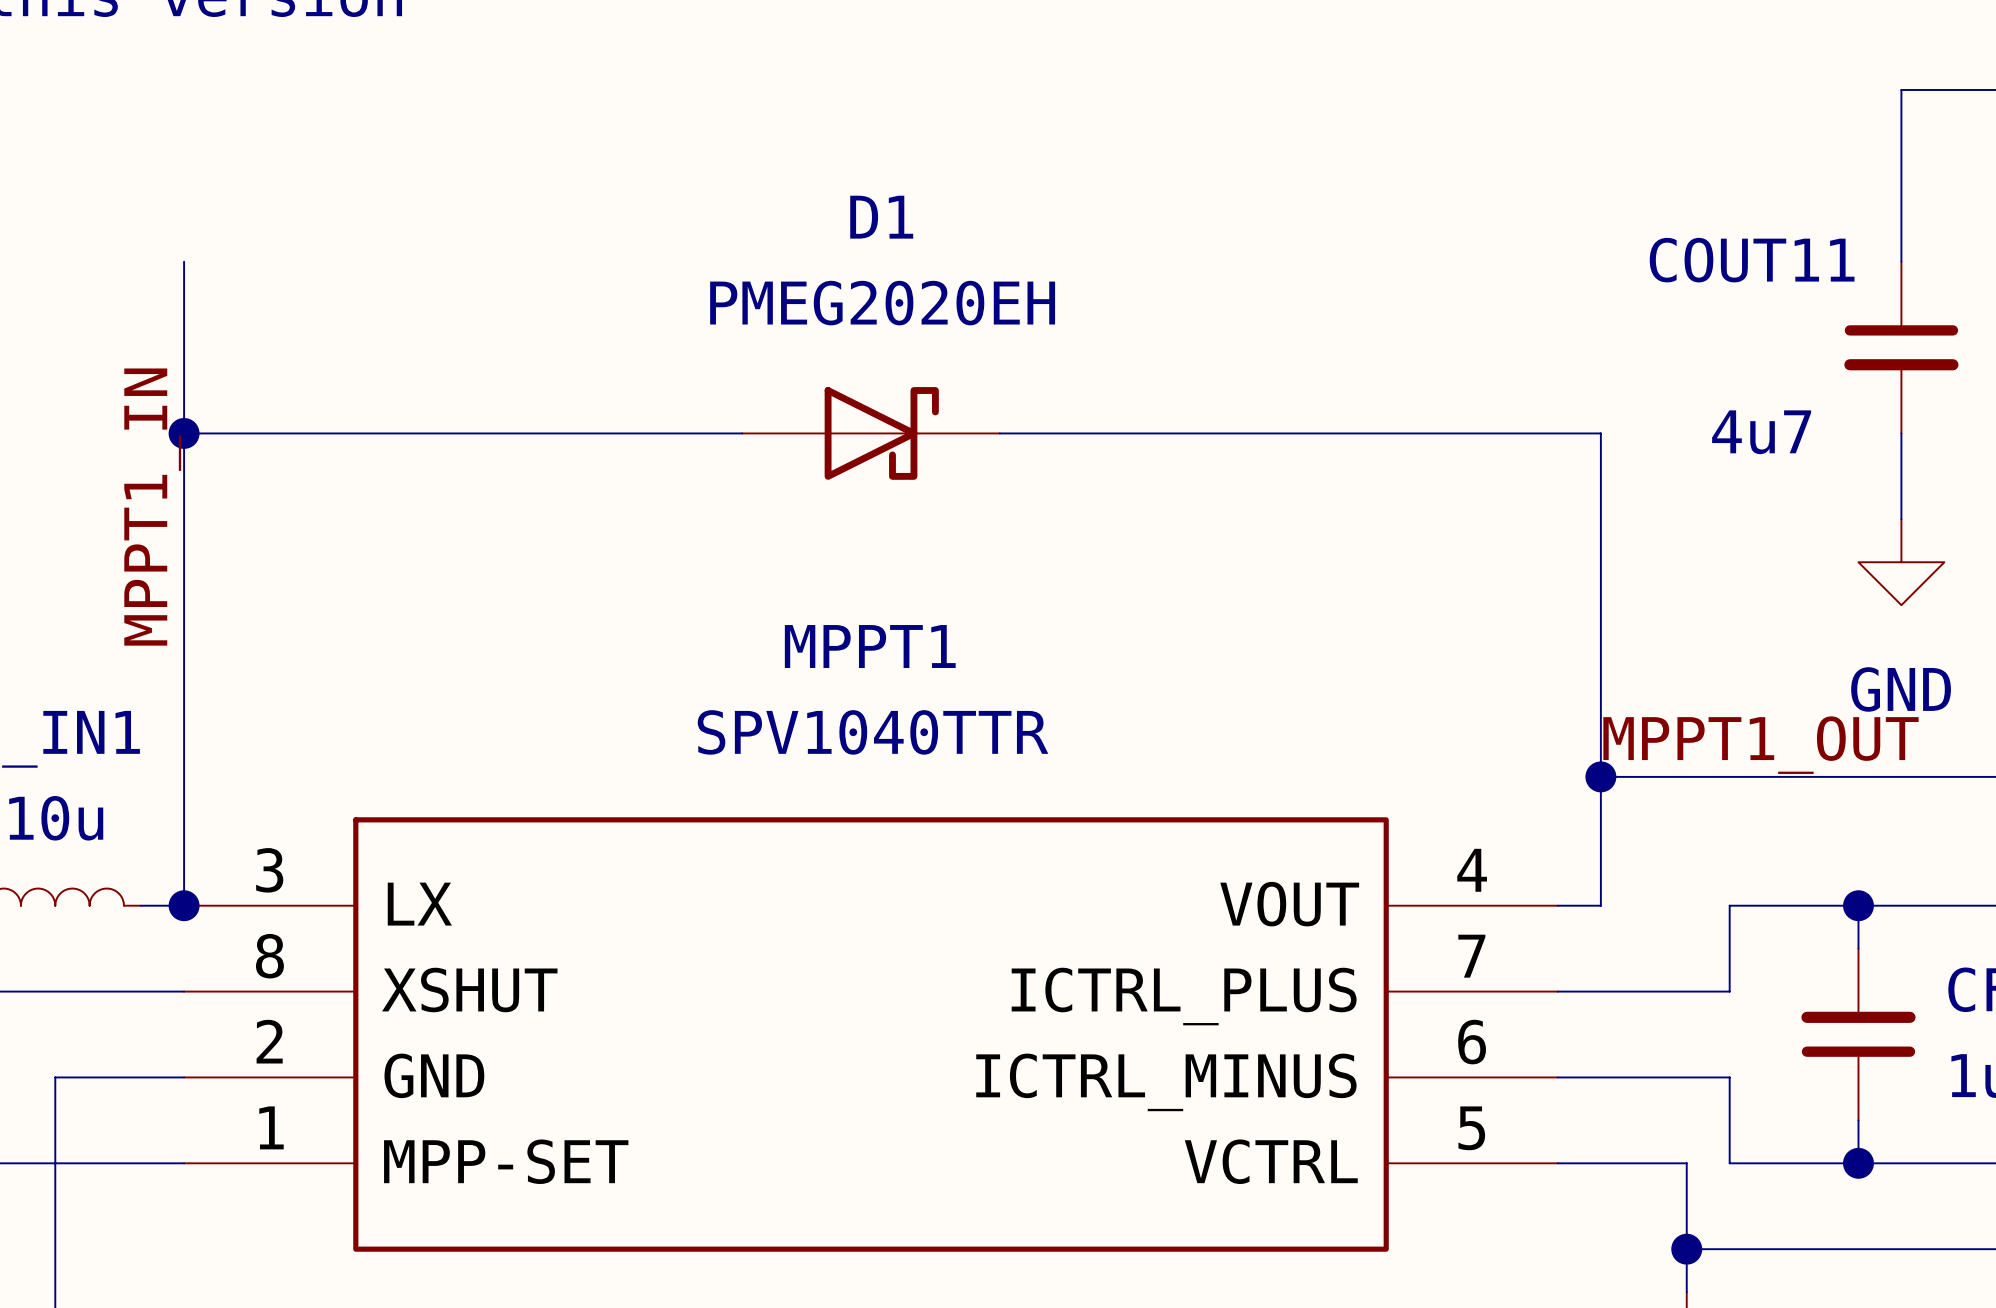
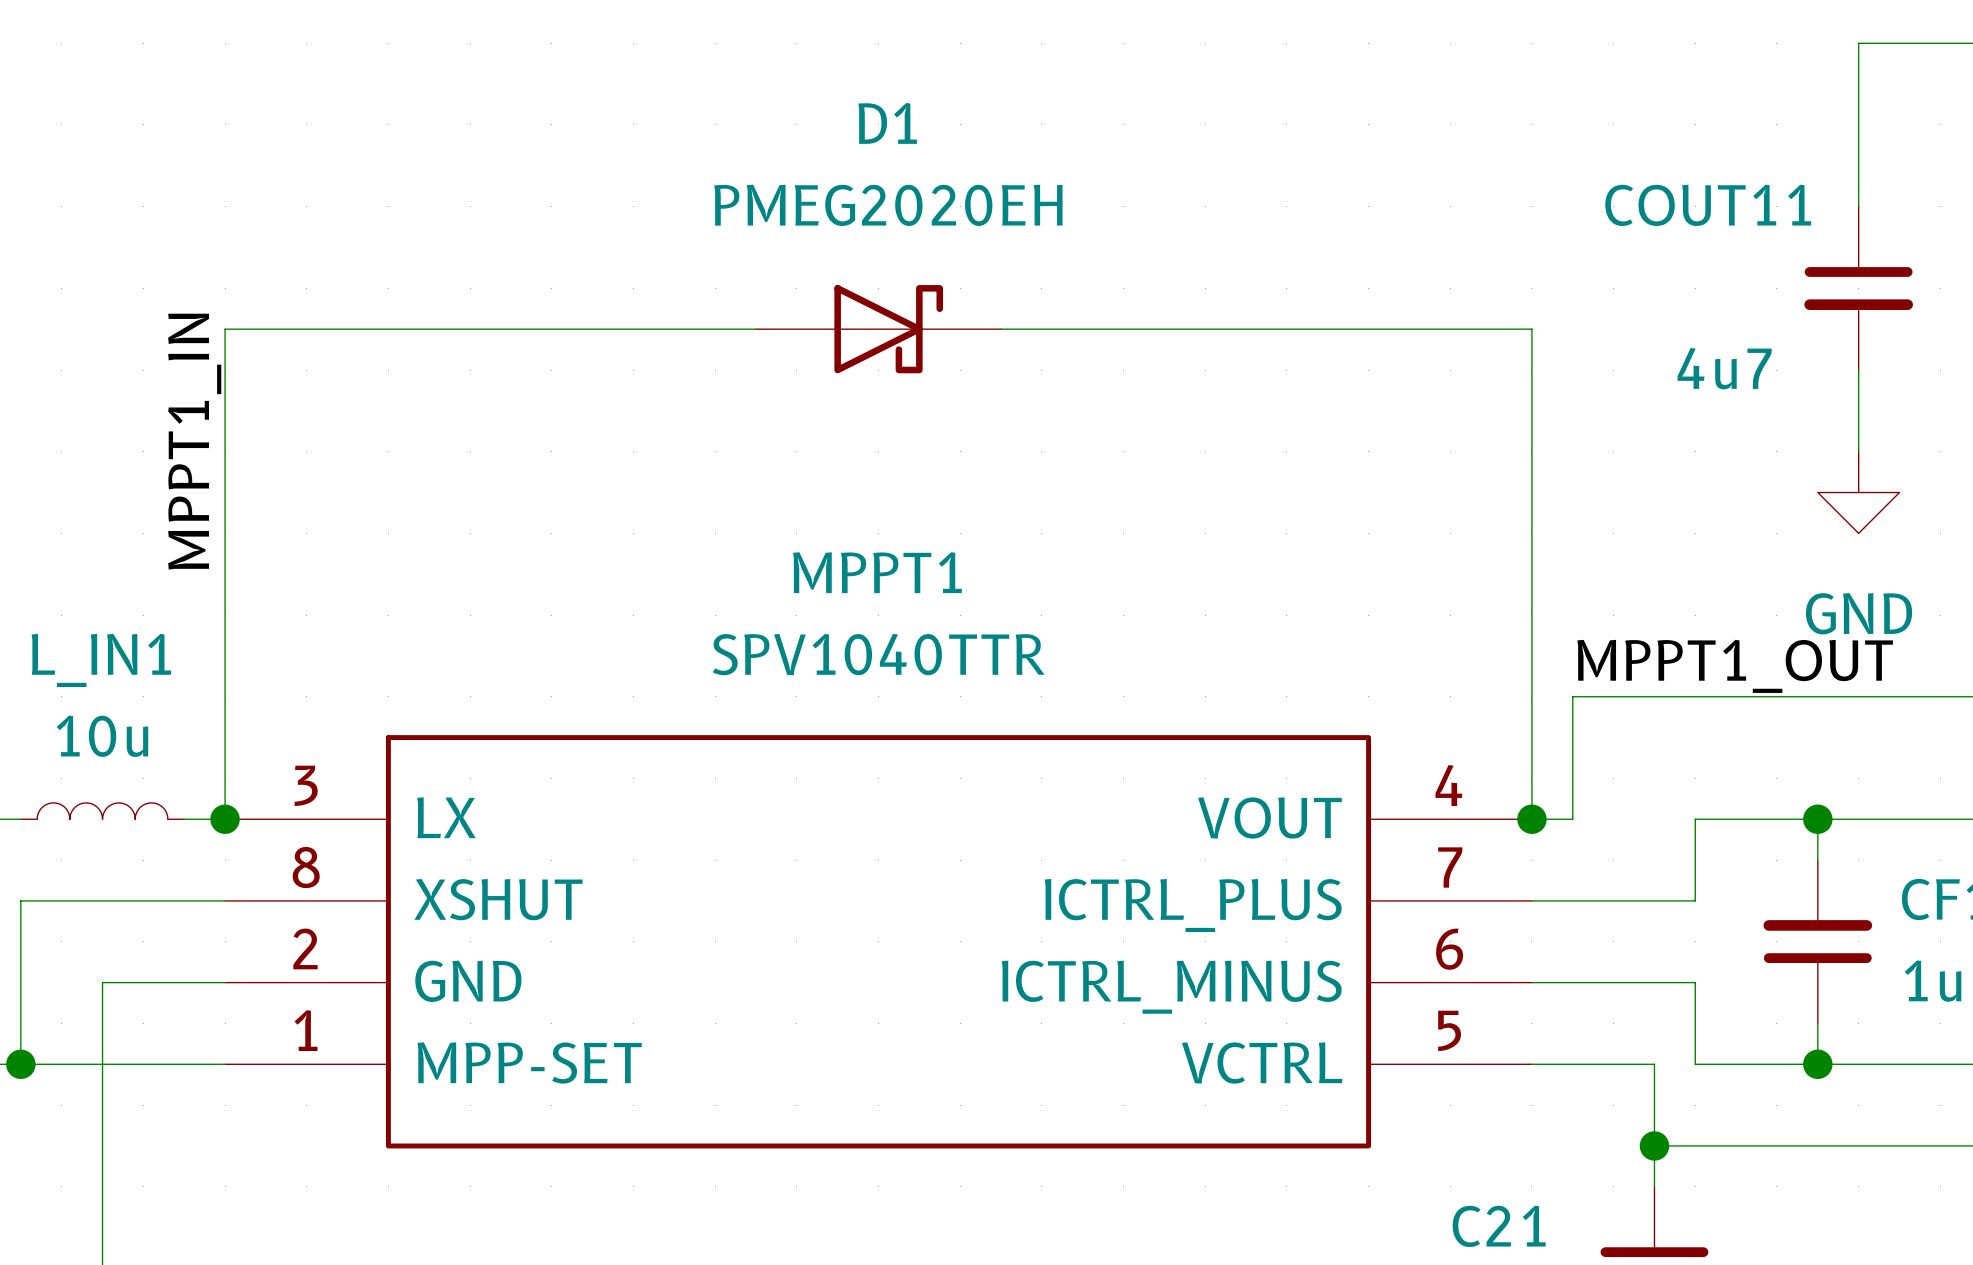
wire: (184, 261) (184, 390) -> (755, 329) (225, 329)
wire: none -> (1001, 329) (1531, 329) (1531, 819)
wire: (184, 433) (742, 433) -> none
junction: (184, 433) -> none
D1 position: (871, 433) -> (878, 329)
wire: (999, 433) (1600, 433) (1600, 776) -> none
junction position: (1600, 776) -> (1531, 819)

